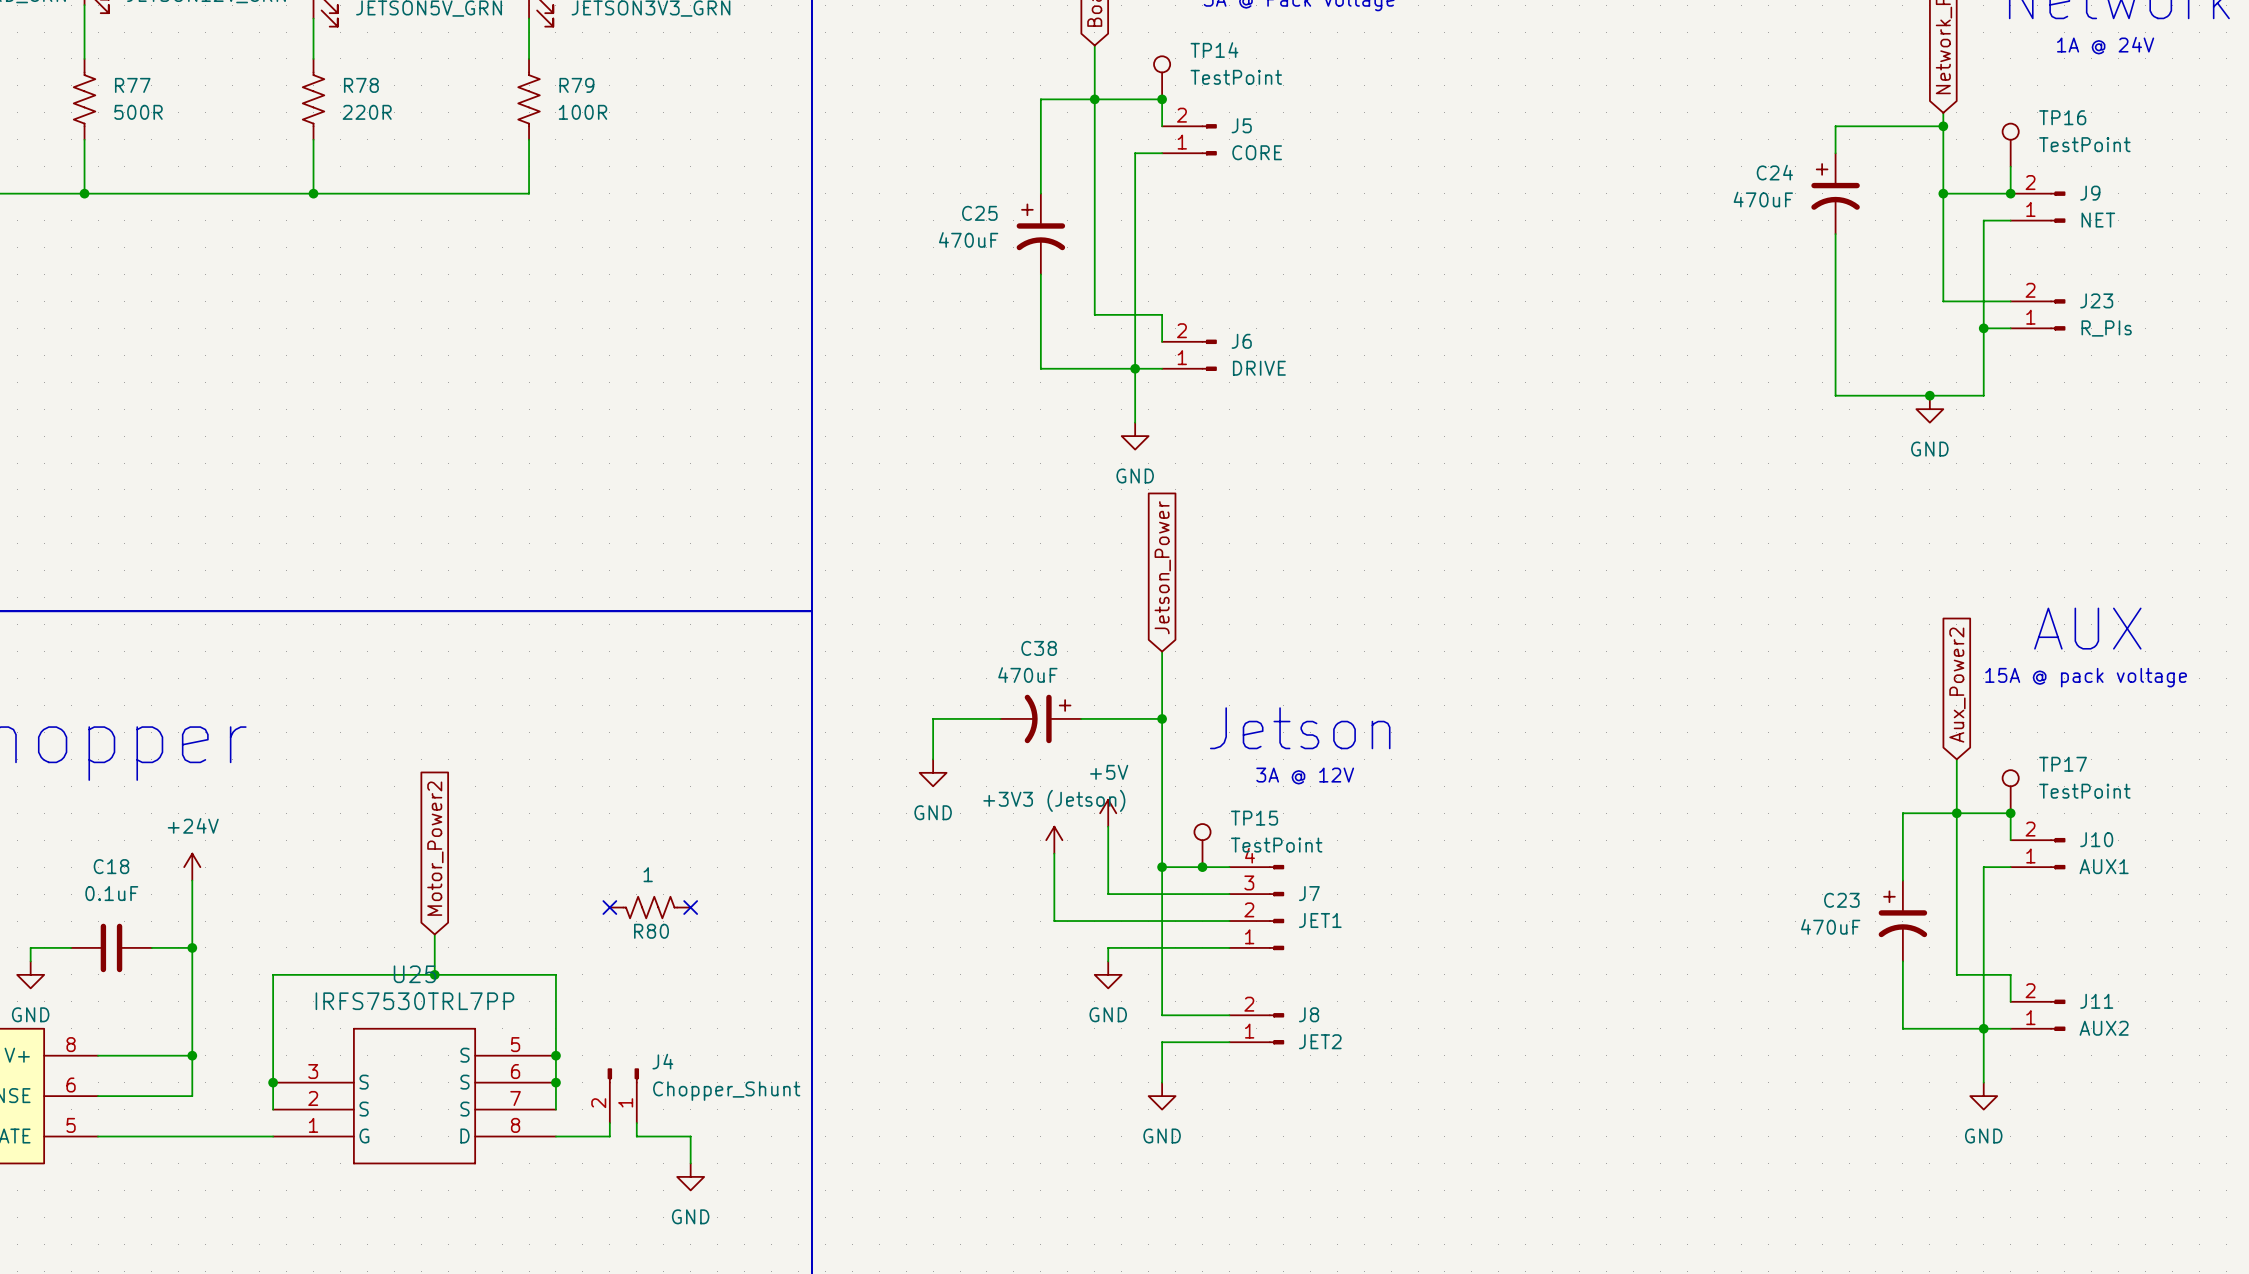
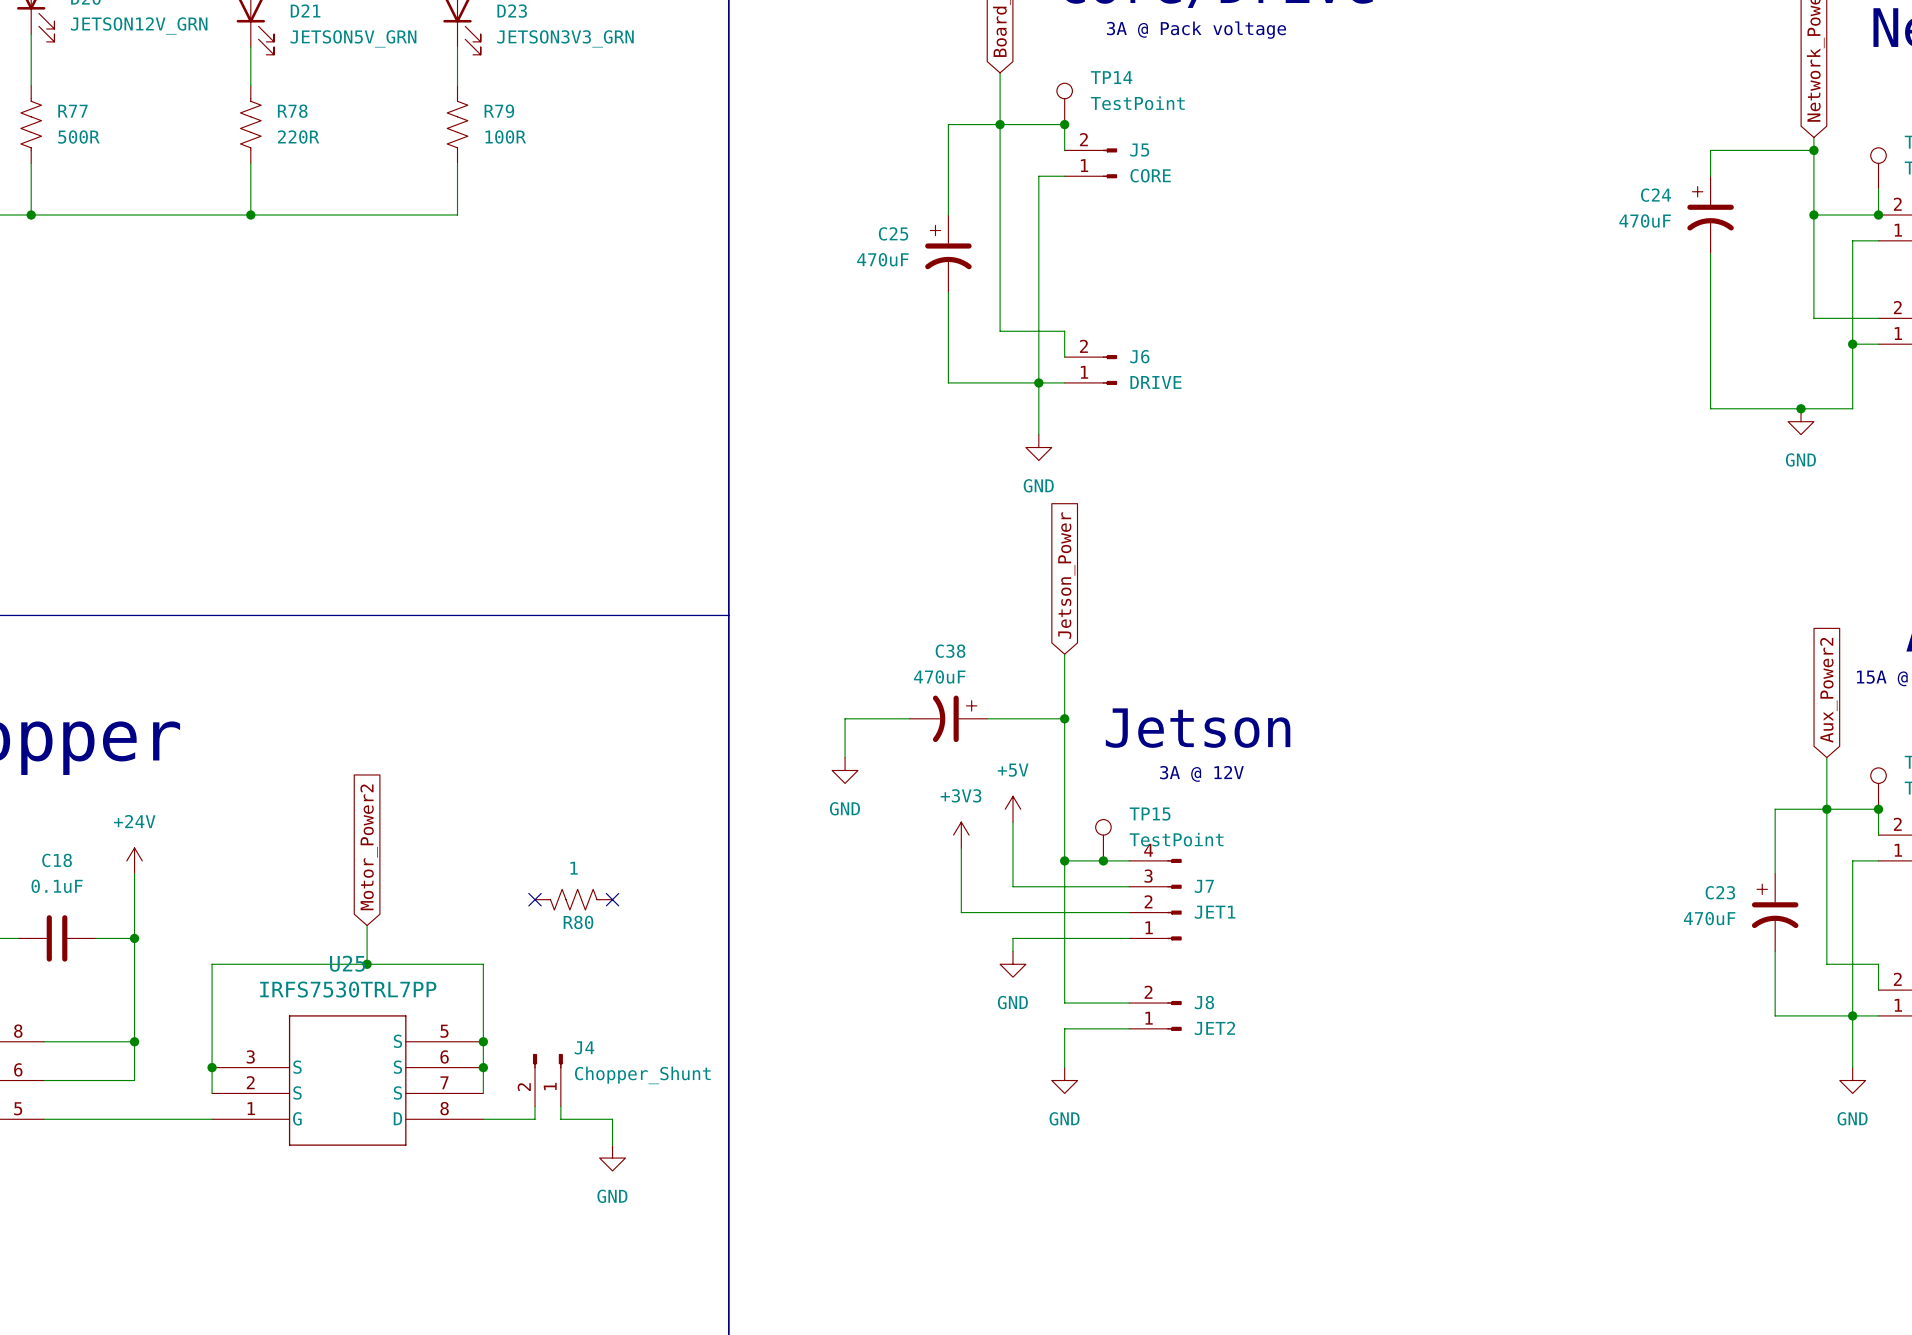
power symbol: +3V3 (Jetson) (1054, 840) -> +3V3 (961, 835)

